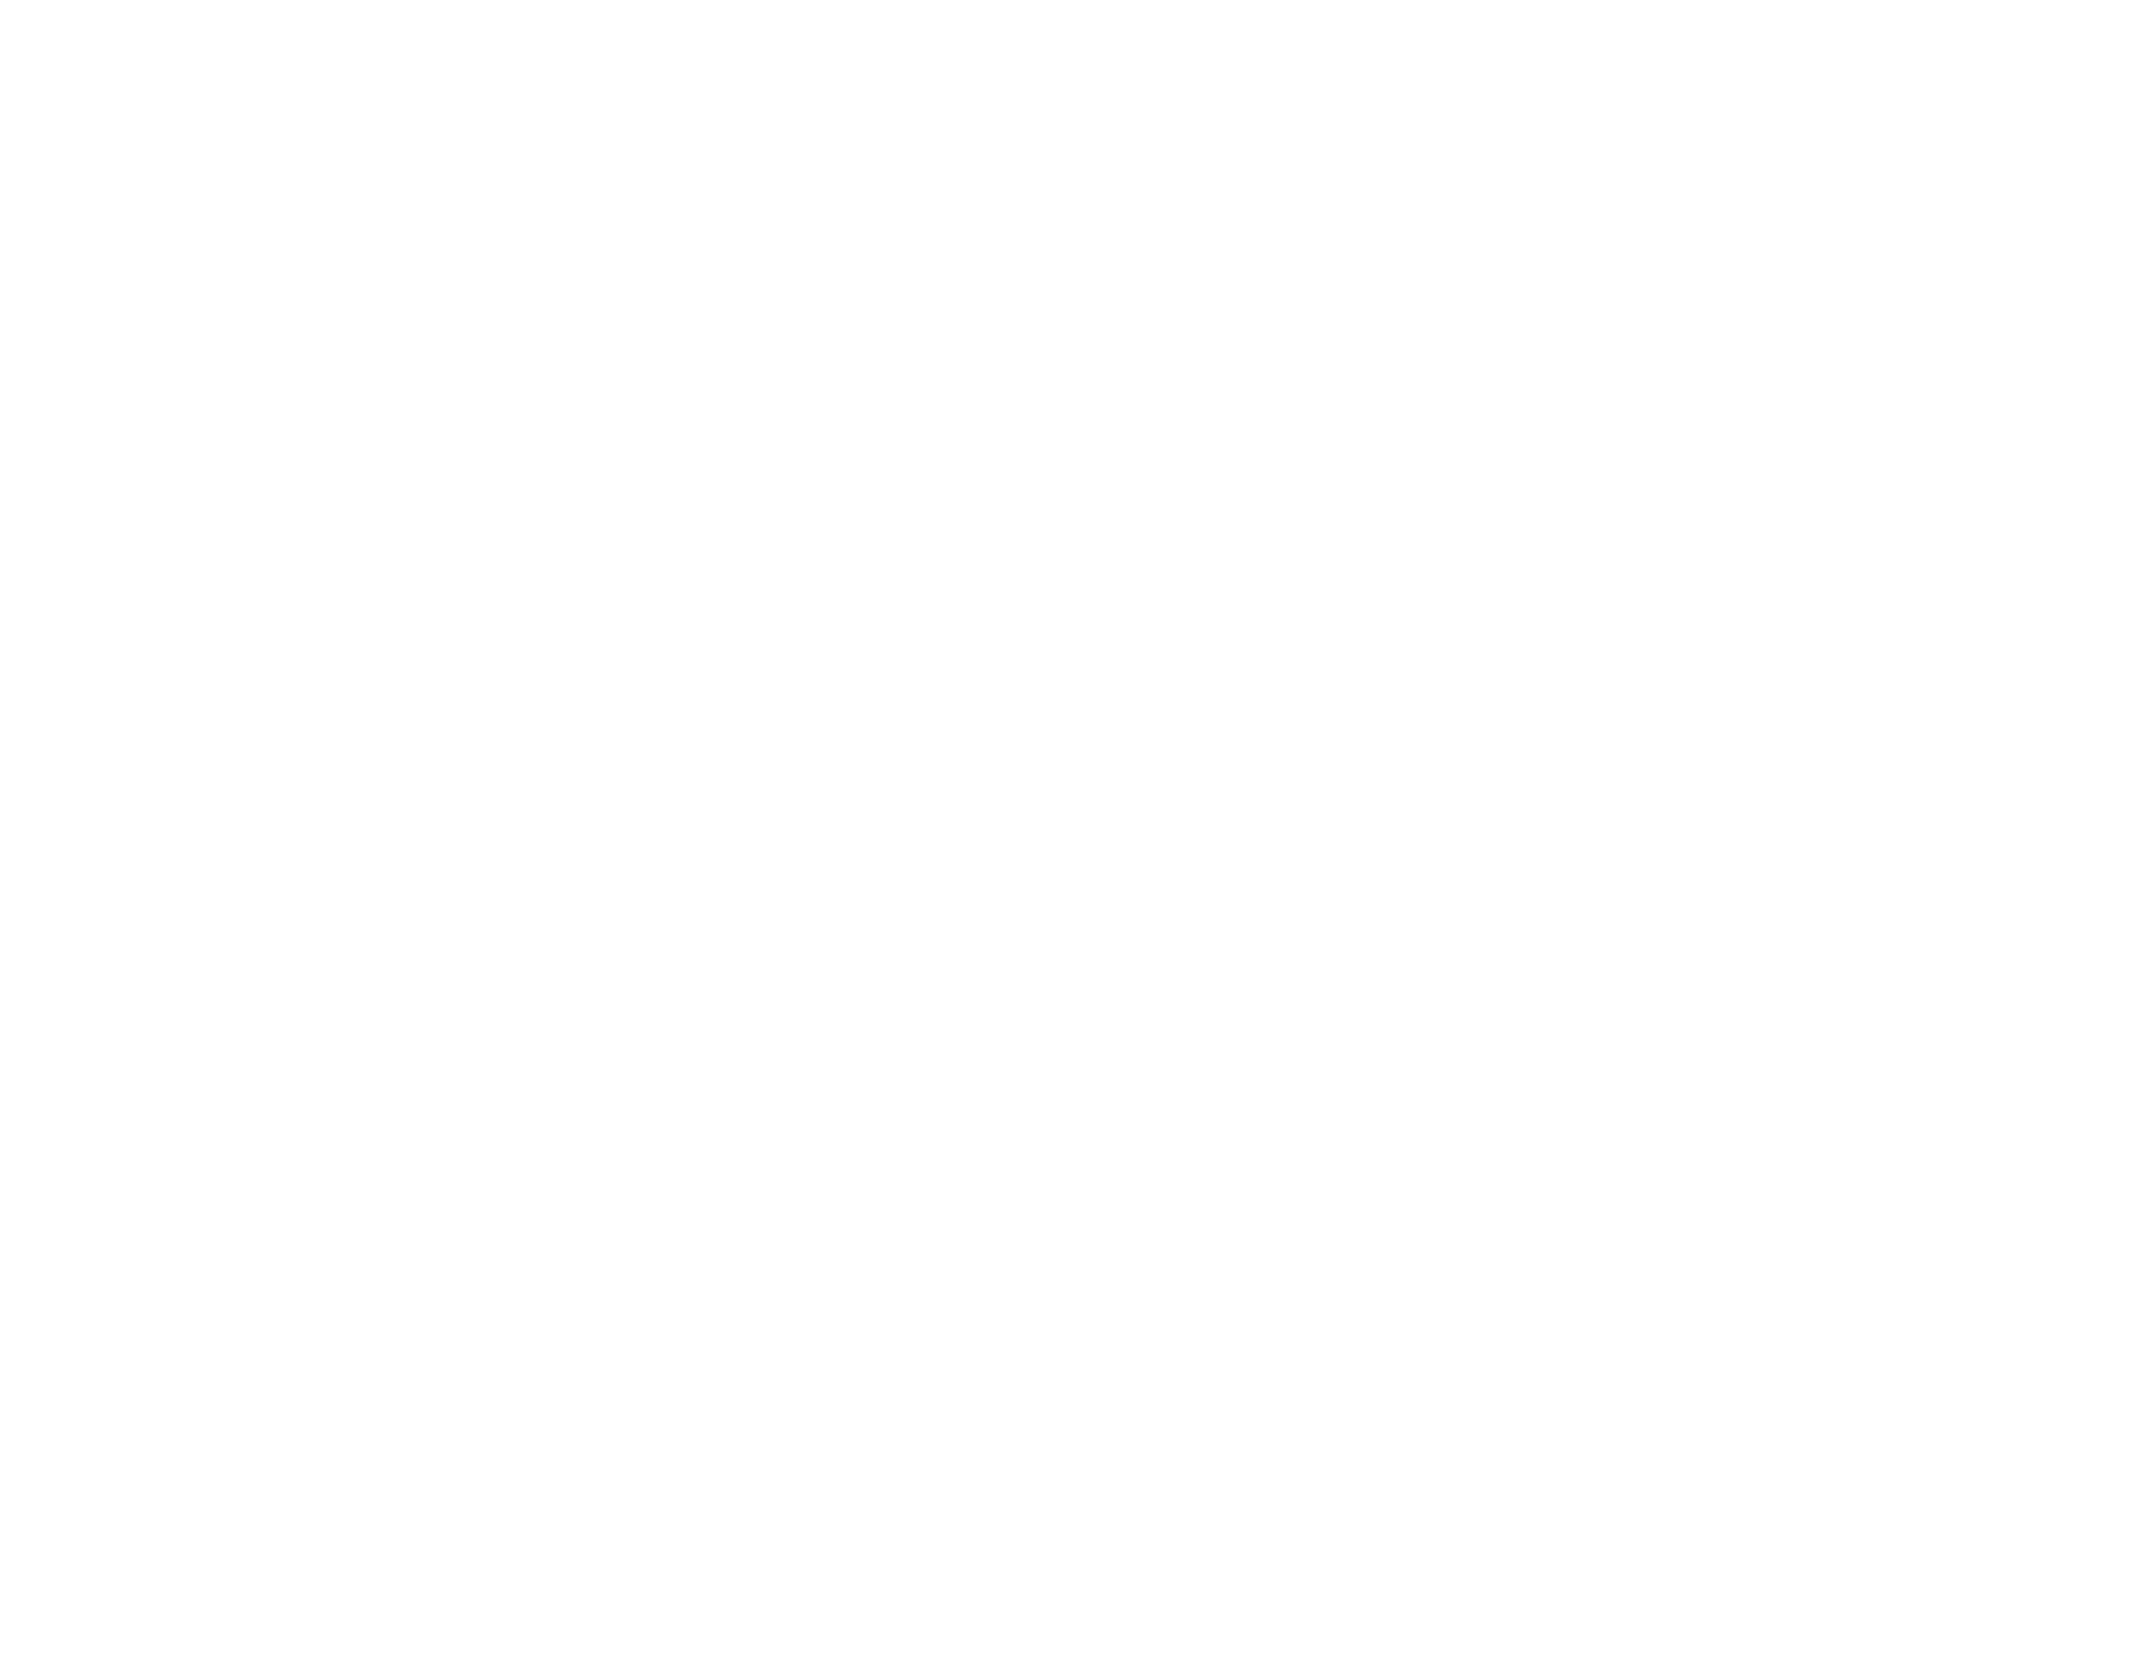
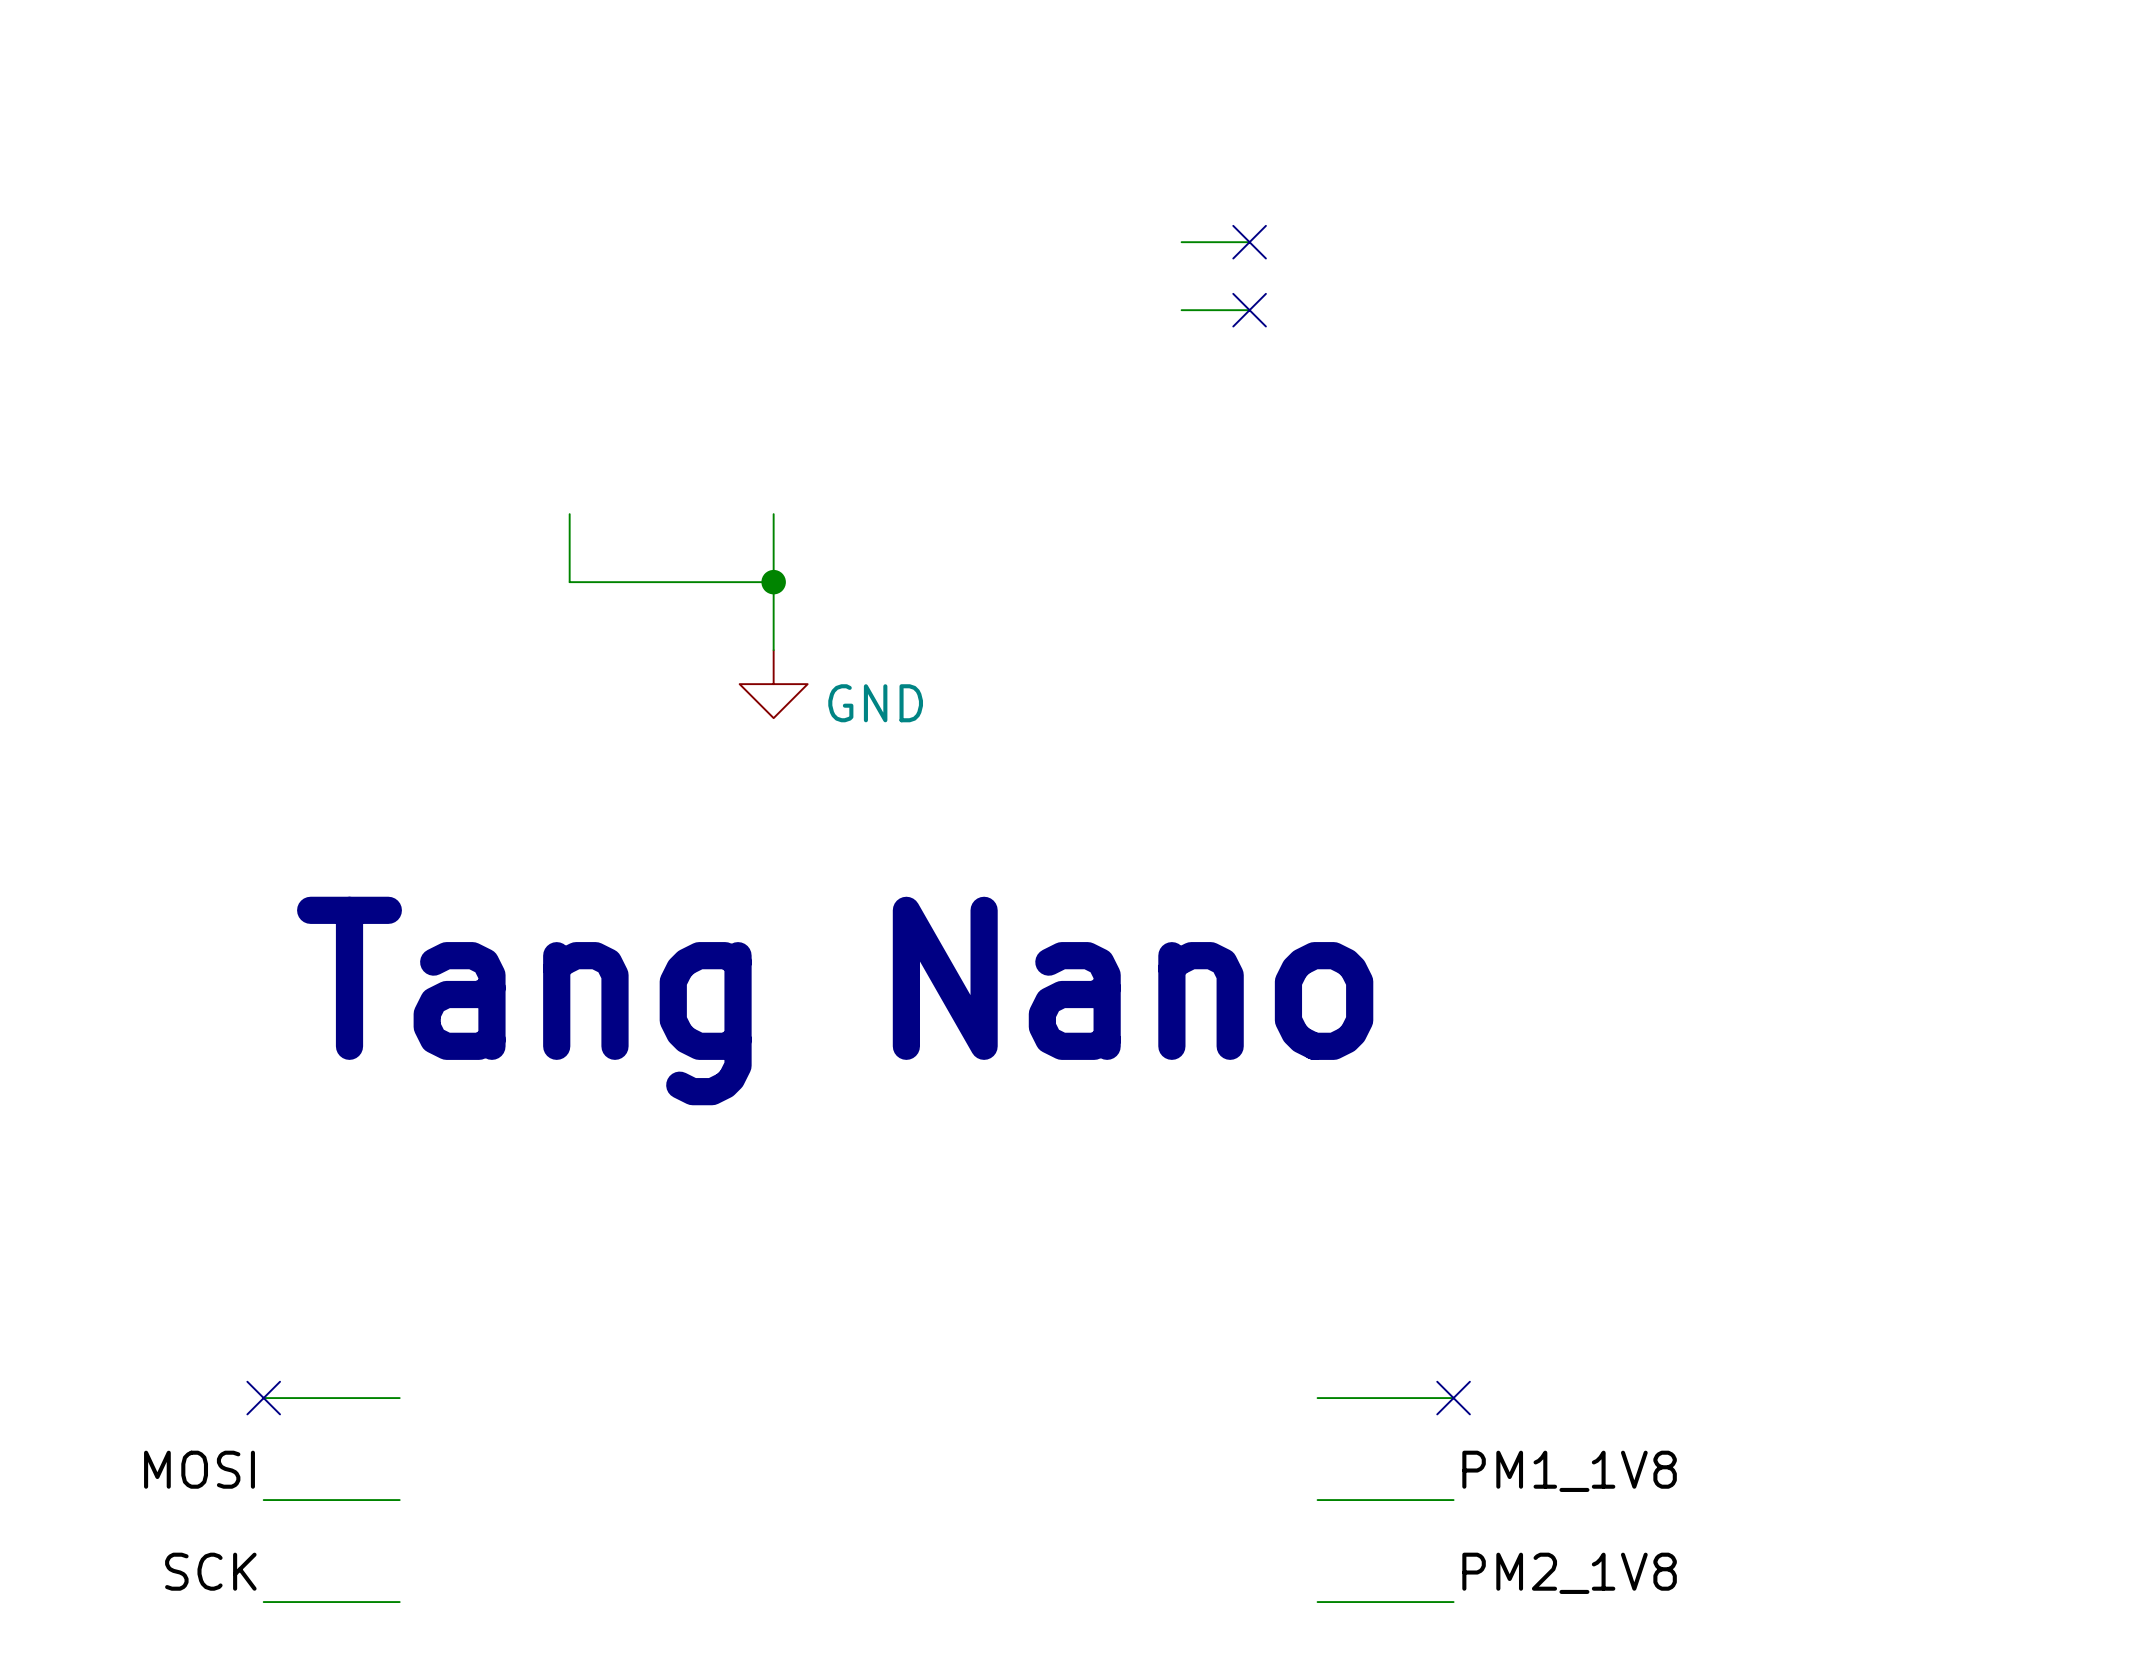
wire: none -> (1181, 242) (1249, 242)
no-connect mark: none -> (1249, 242)
wire: none -> (1181, 310) (1249, 310)
no-connect mark: none -> (1249, 310)
wire: none -> (569, 514) (569, 582) (773, 582)
wire: none -> (773, 514) (773, 650)
junction: none -> (773, 582)
power symbol: none -> GND (773, 684)
text: none -> Tang Nano (835, 1000)
wire: none -> (263, 1398) (399, 1398)
no-connect mark: none -> (263, 1398)
wire: none -> (1317, 1398) (1453, 1398)
no-connect mark: none -> (1453, 1398)
label: none -> MOSI (199, 1469)
label: none -> PM1_1V8 (1569, 1471)
wire: none -> (263, 1500) (399, 1500)
wire: none -> (1317, 1500) (1453, 1500)
label: none -> SCK (210, 1571)
label: none -> PM2_1V8 (1569, 1573)
wire: none -> (263, 1602) (399, 1602)
wire: none -> (1317, 1602) (1453, 1602)

